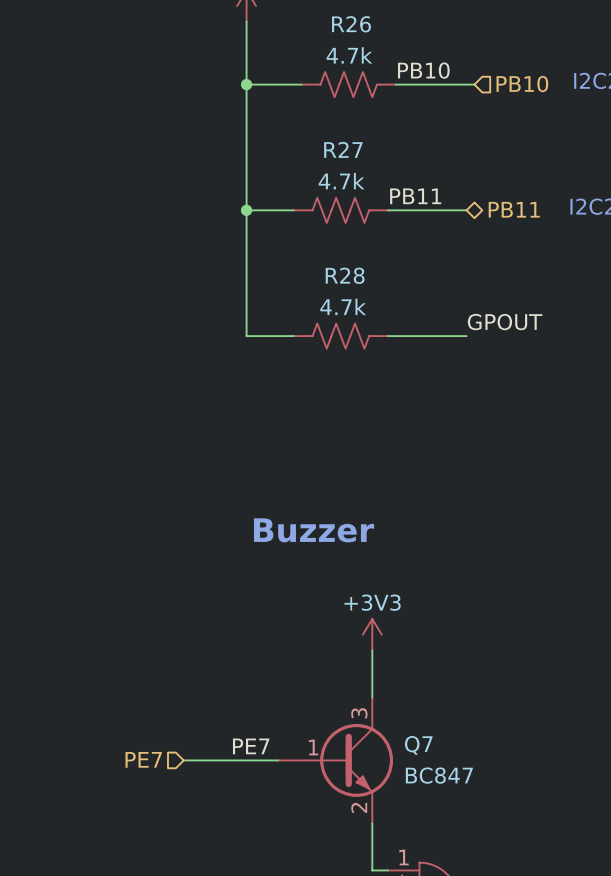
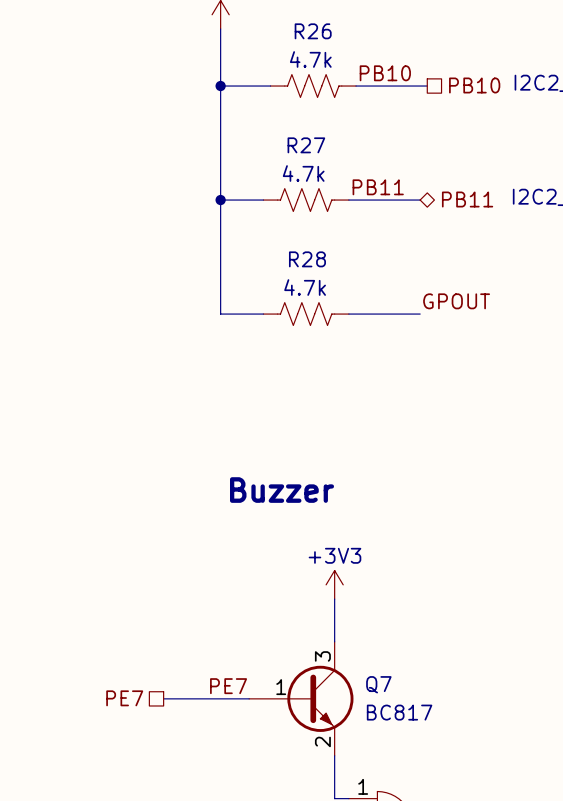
hierarchical label shape: input (522, 84) -> passive (474, 85)
hierarchical label shape: input (143, 759) -> passive (124, 698)
Q7 value: BC847 (439, 775) -> BC817 (399, 712)

